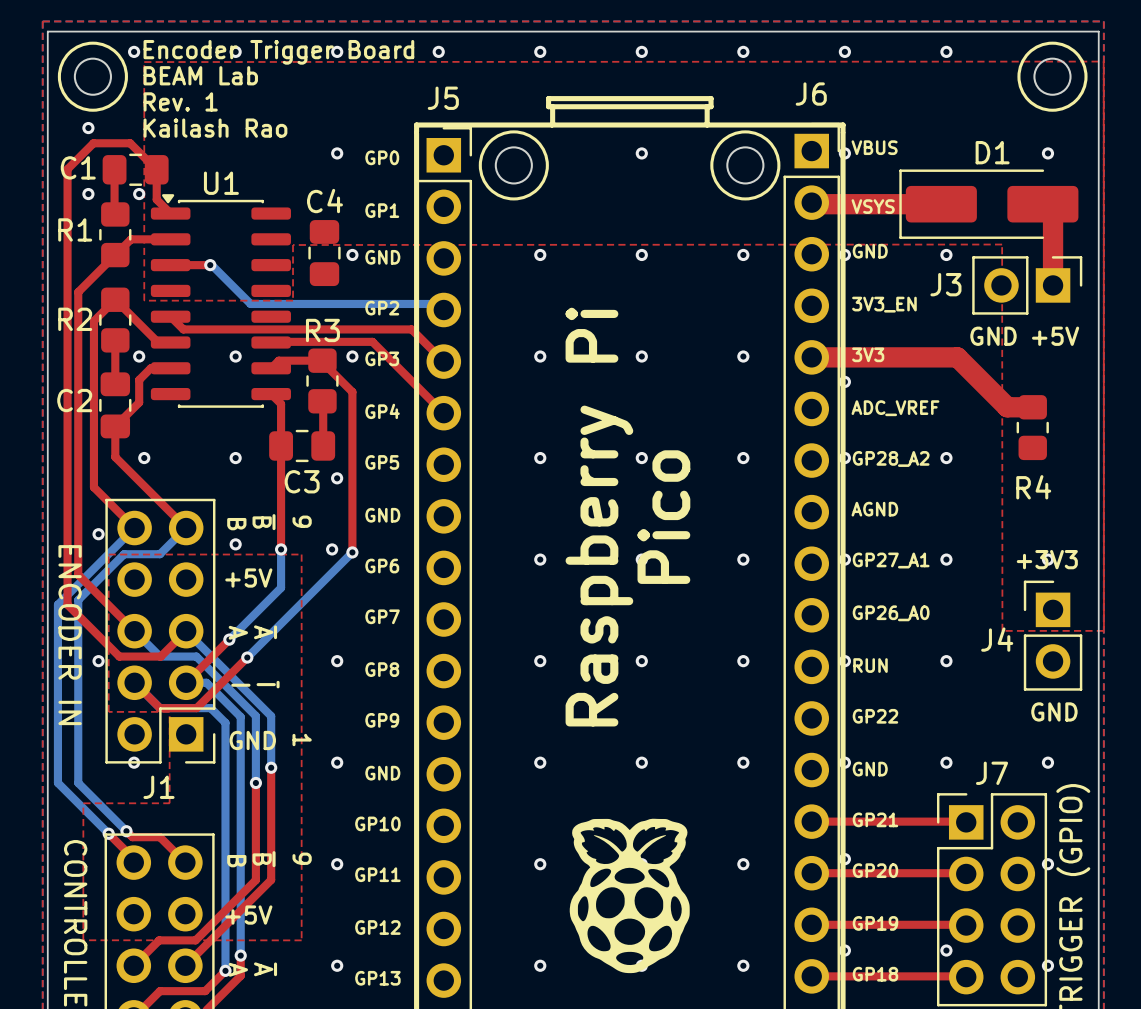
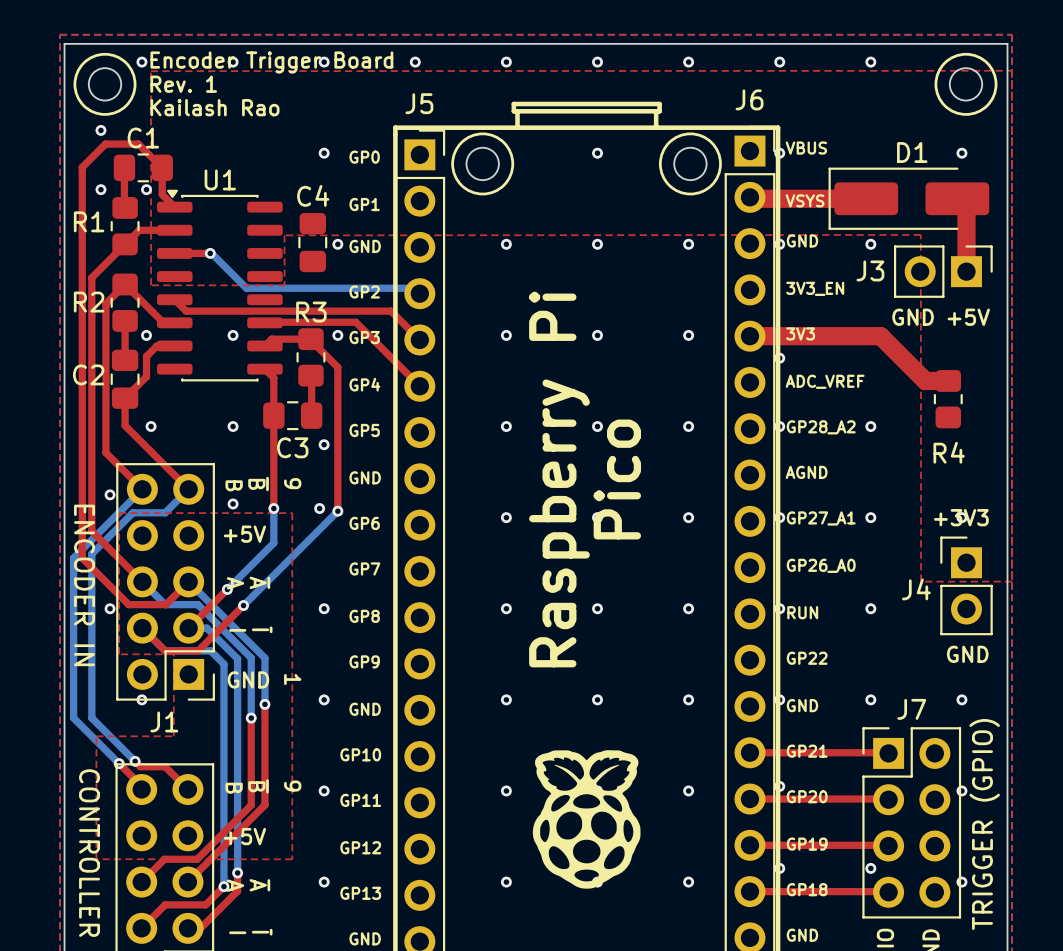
text: BEAM Lab (200, 75) -> Rev. 1 (183, 84)
text: Rev. 1 (180, 101) -> Kailash Rao (214, 107)
text: Kailash Rao (215, 128) -> none
C1 name position: C1 (78, 167) -> C1 (143, 138)

